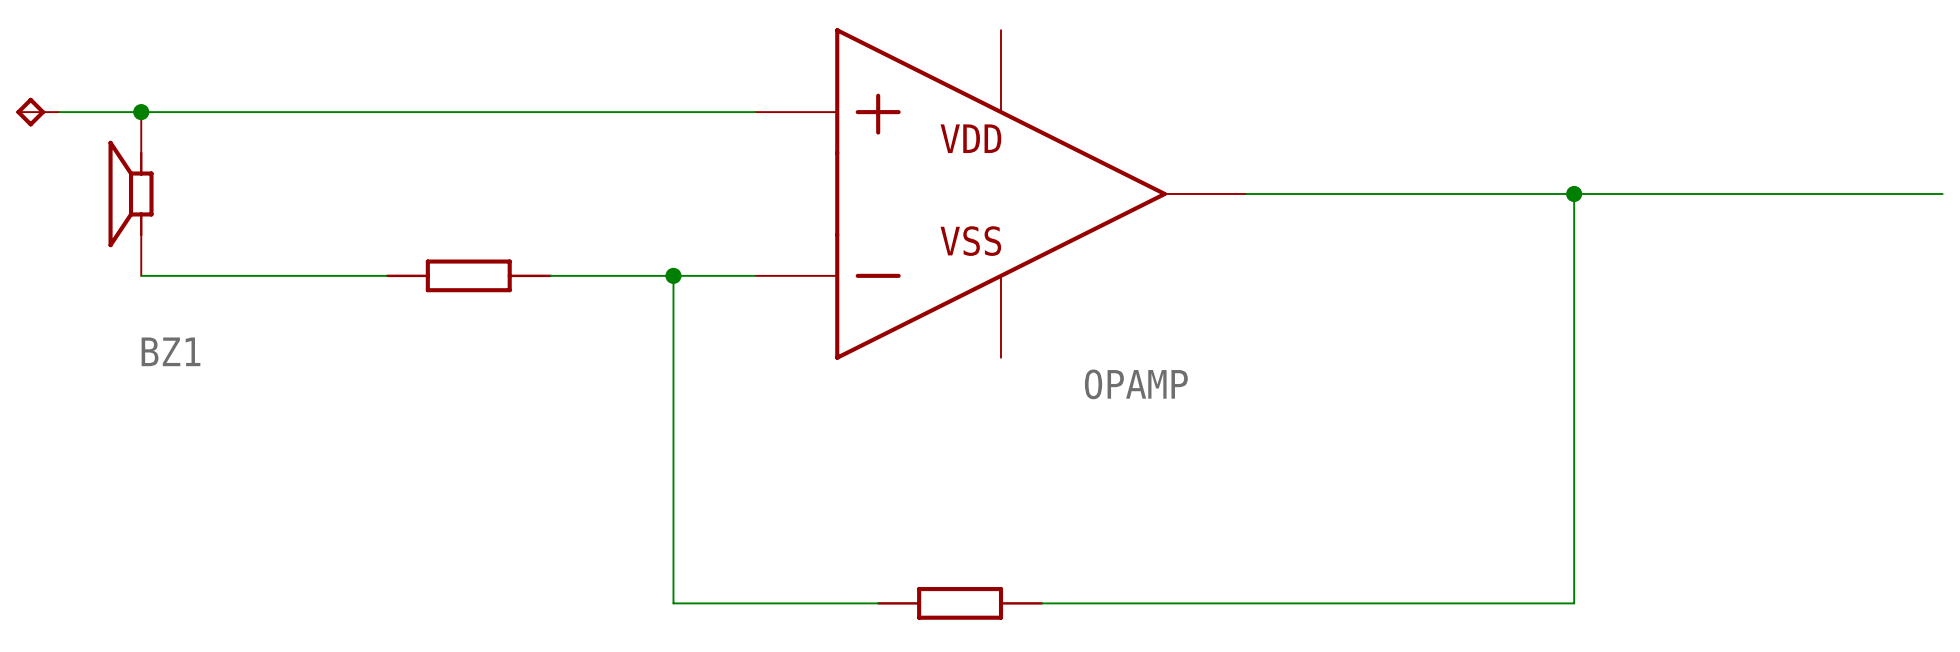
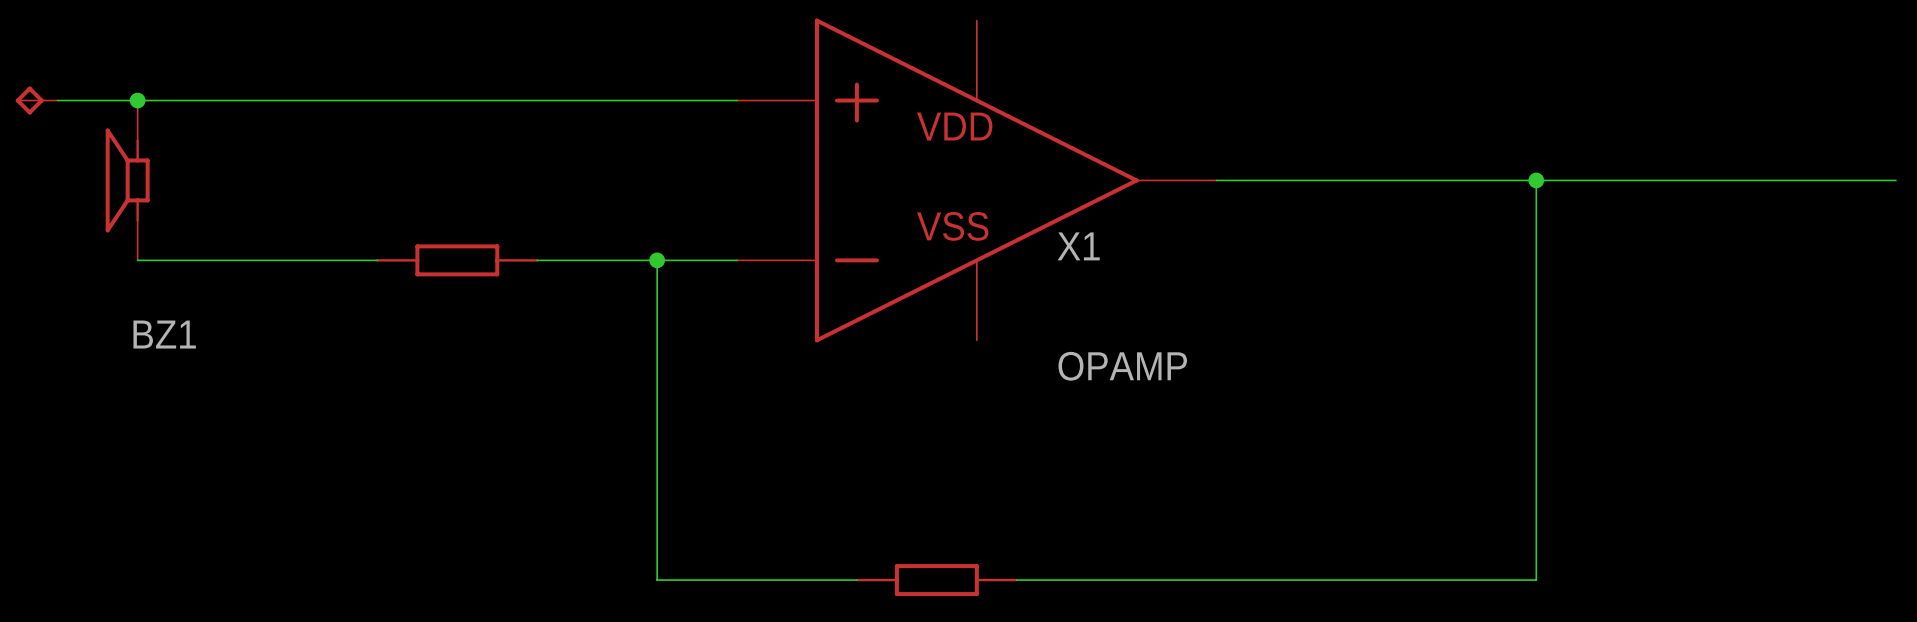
X1 name: none -> X1 (1078, 246)

